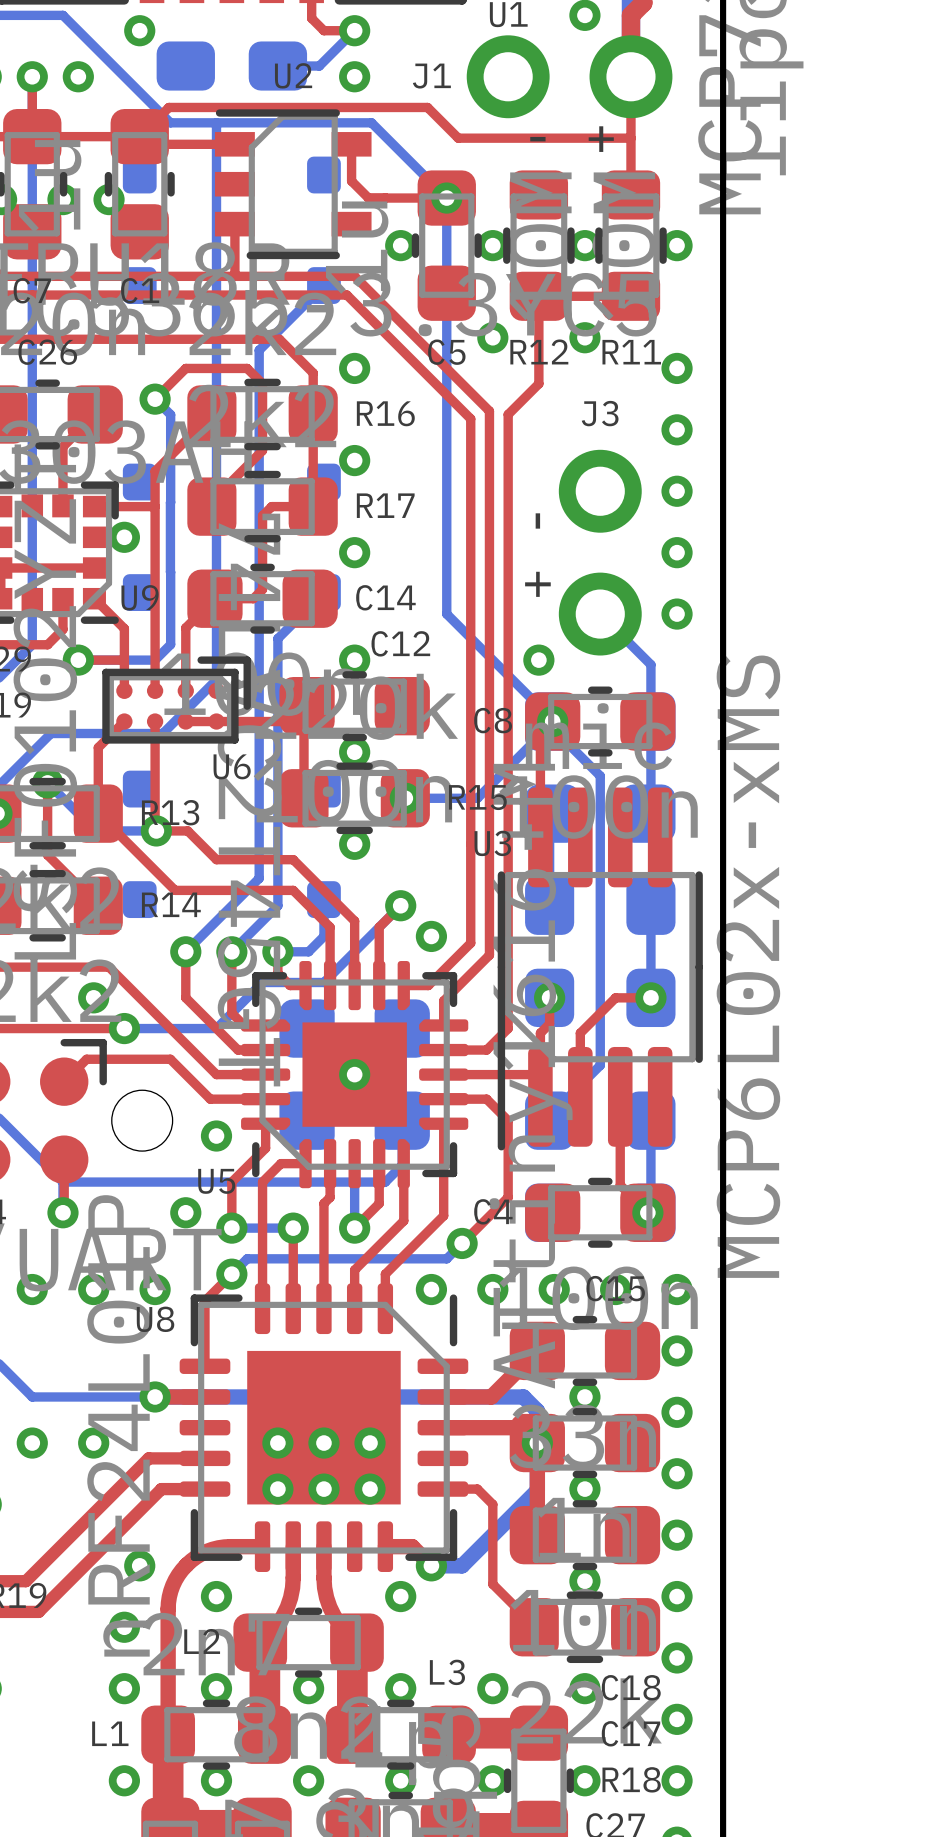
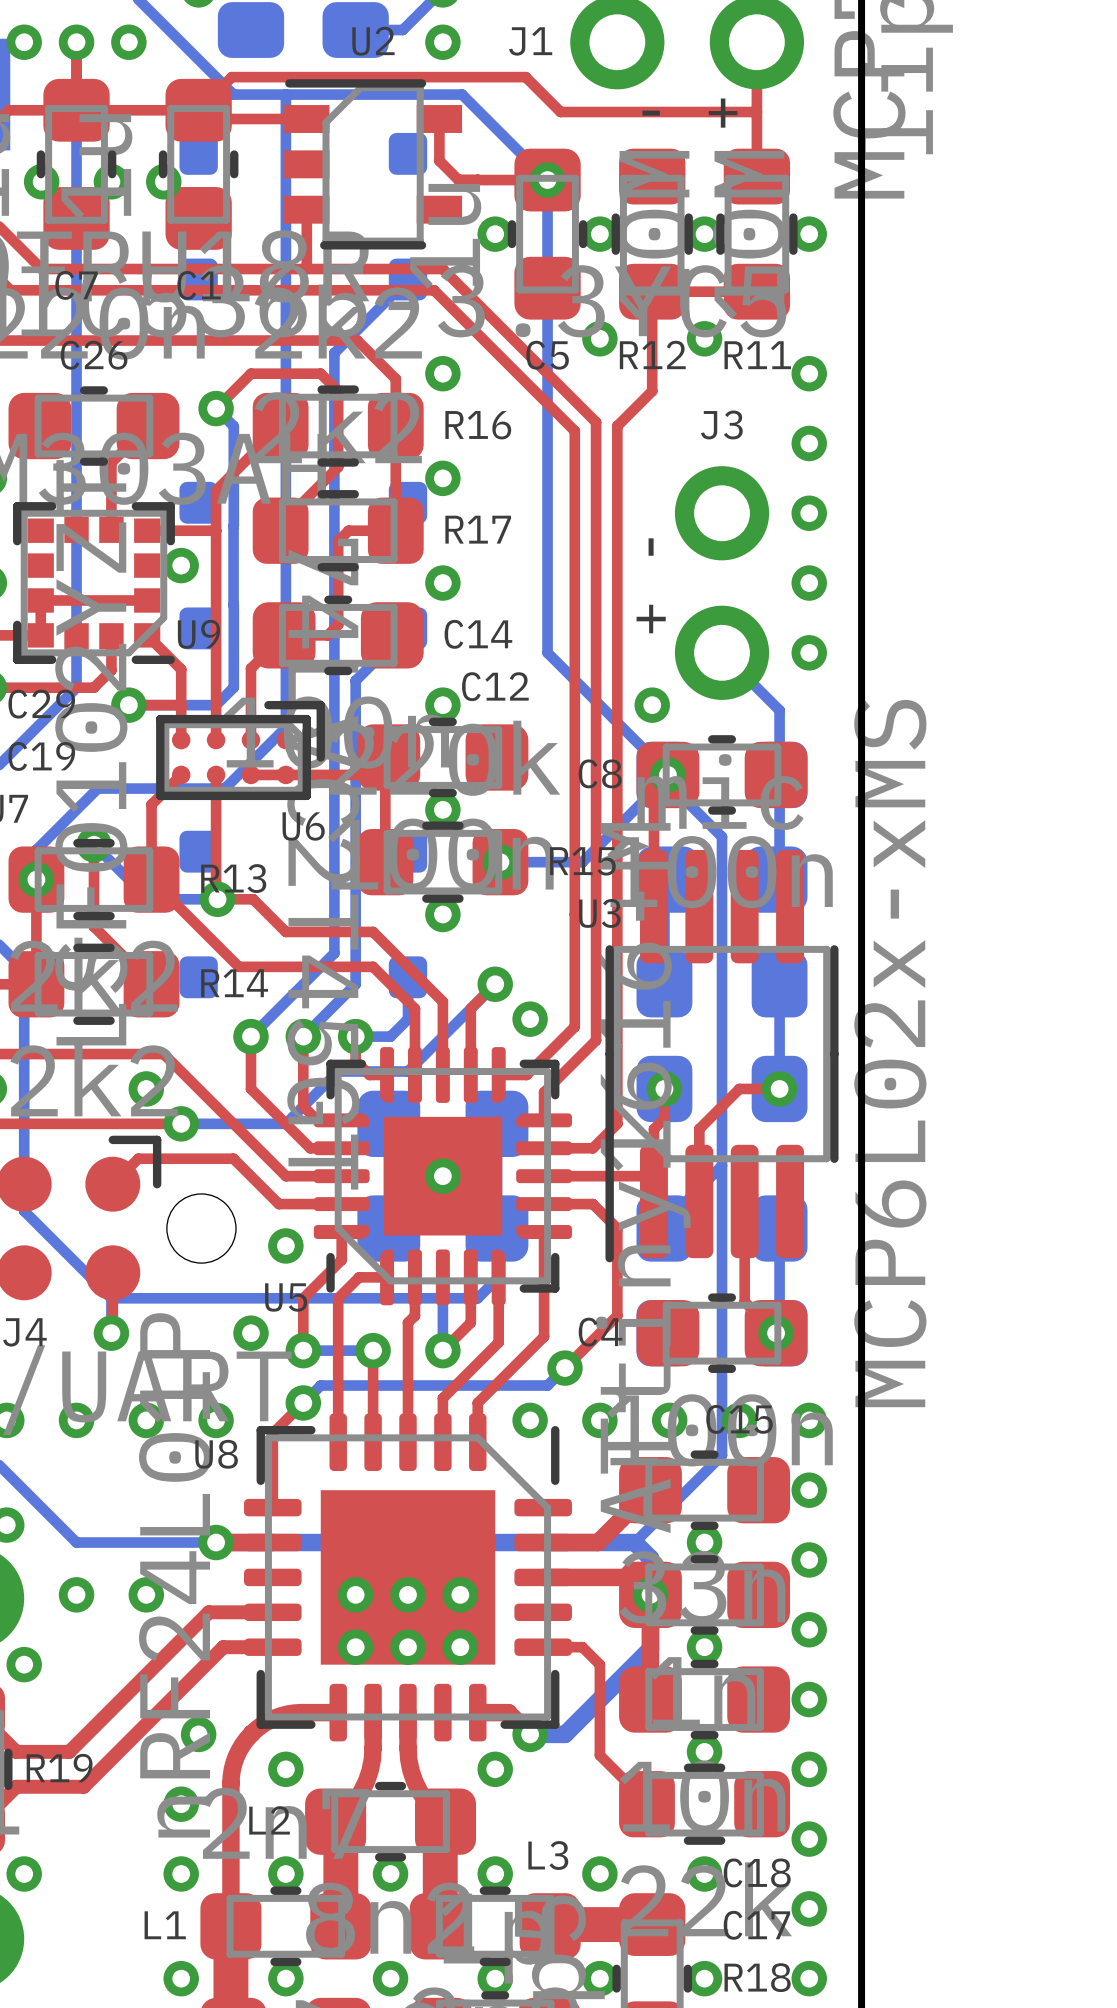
bottom track: none -> (722, 1165) (722, 1455) (634, 1542)

